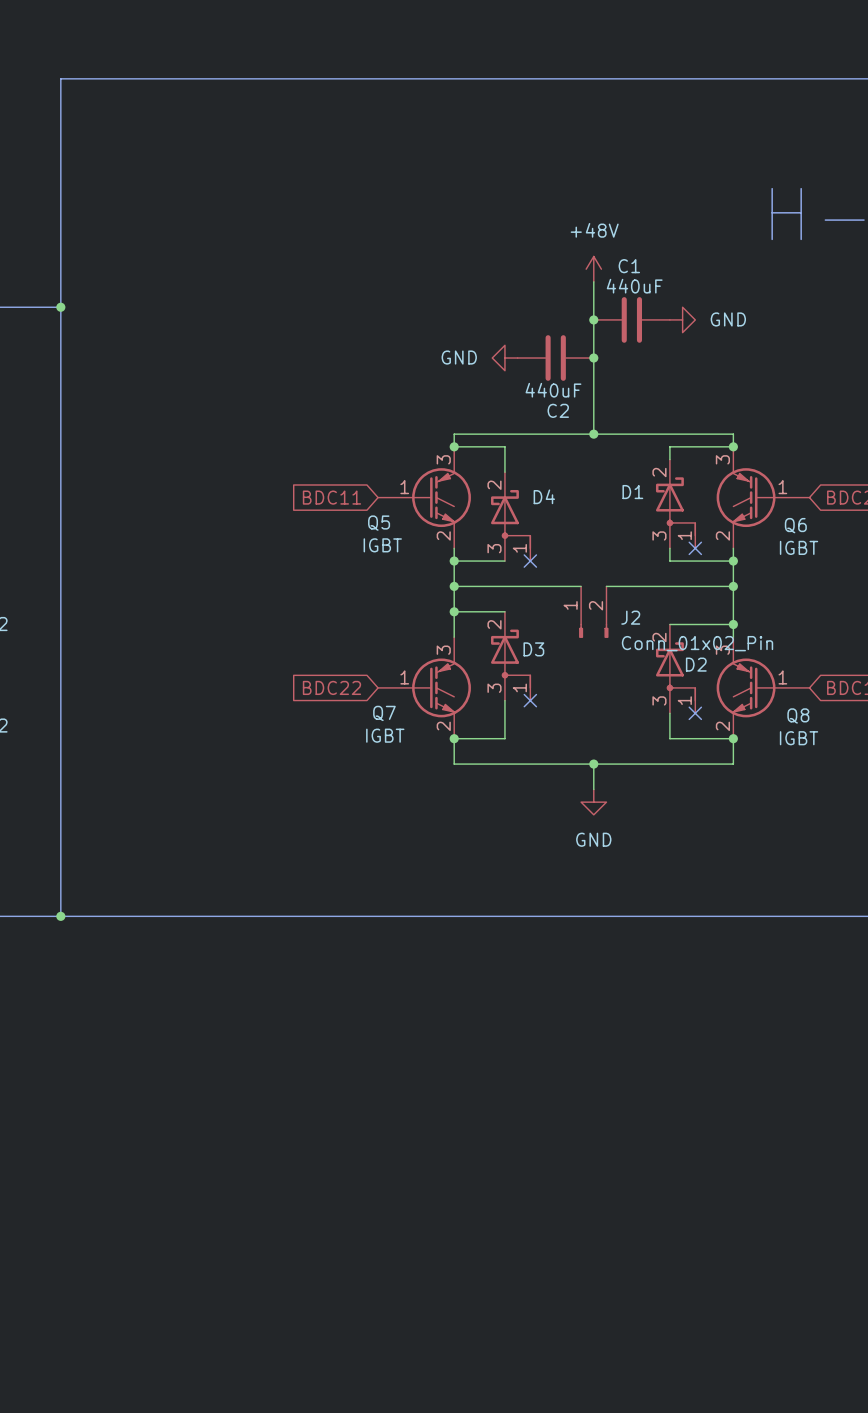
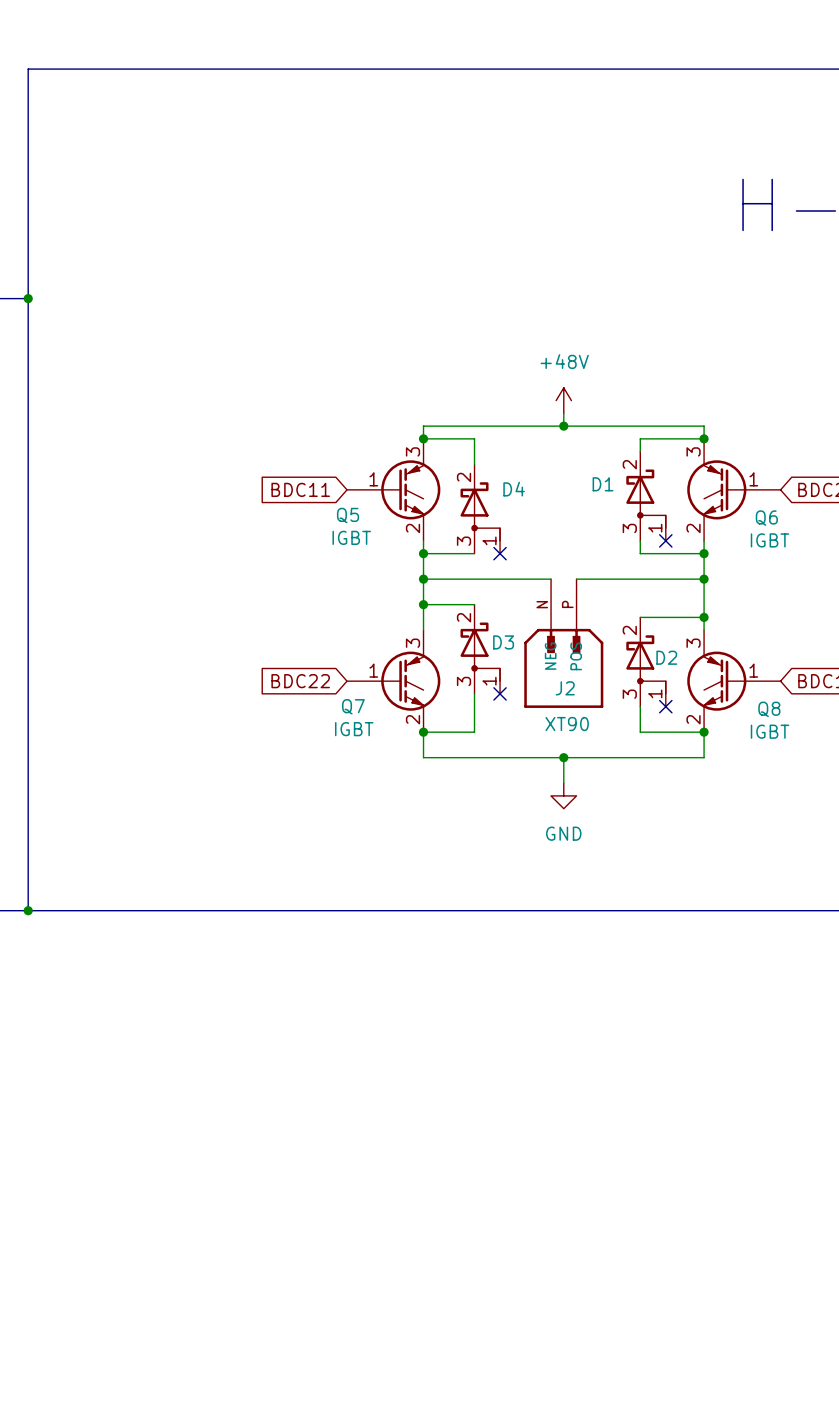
power symbol position: +48V (593, 269) -> +48V (563, 400)
wire: (593, 281) (593, 421) -> none
junction: (593, 319) -> none
C1: 440uF (631, 319) -> none
power symbol: GND (682, 319) -> none
power symbol: GND (504, 358) -> none
C2: 440uF (555, 358) -> none
junction: (593, 358) -> none
J2 symbol: [579, 586, 609, 638] -> [524, 579, 604, 708]
J2 name position: J2 (630, 617) -> J2 (565, 688)
J2 value: Conn_01x02_Pin (697, 643) -> XT90 (567, 724)

